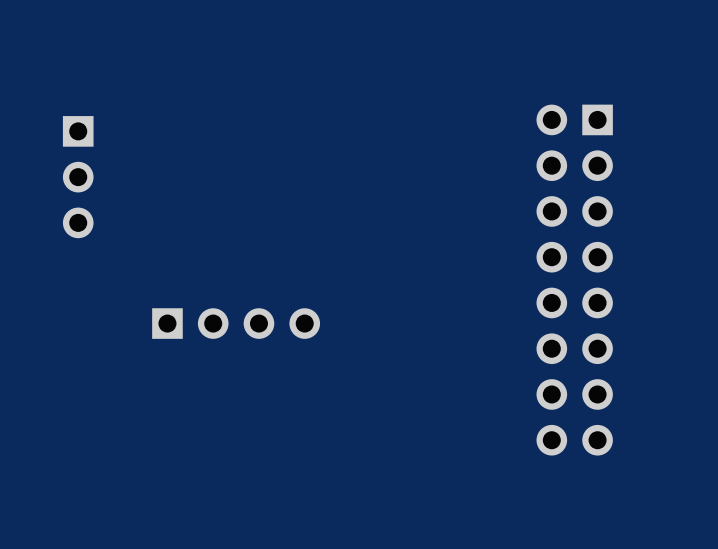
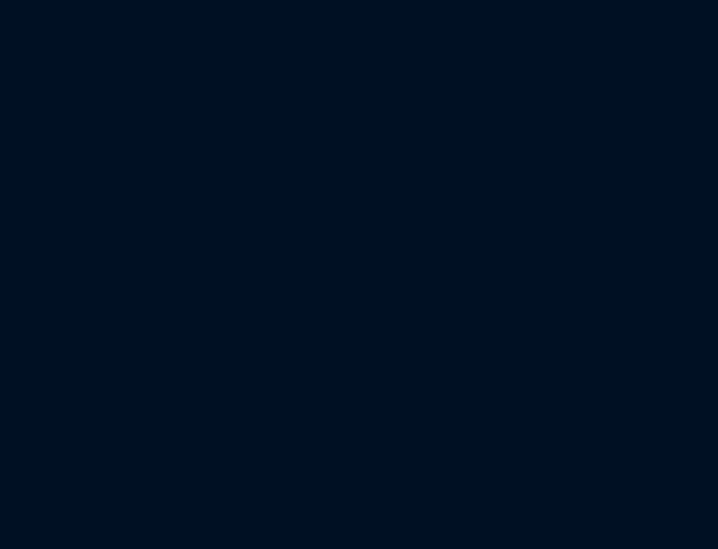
part: (78, 177) -> none
part: (574, 280) -> none
part: (236, 323) -> none

